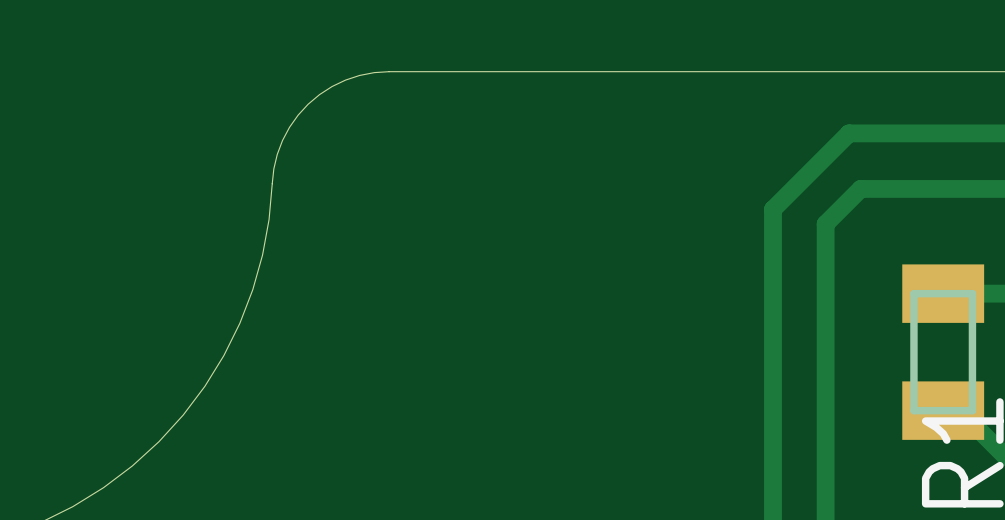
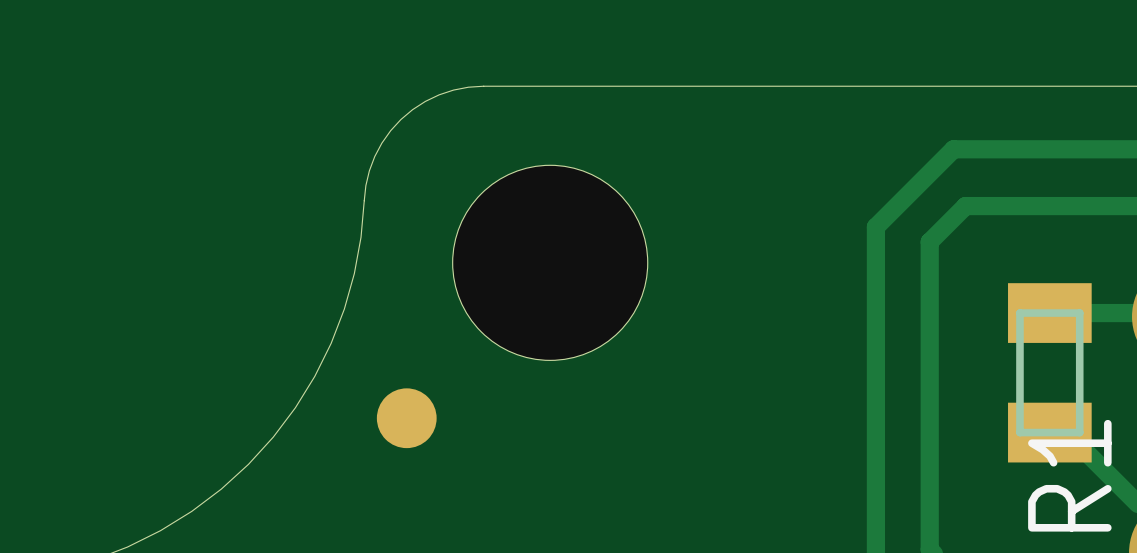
hole: none -> (550, 262)
part: none -> (406, 418)

